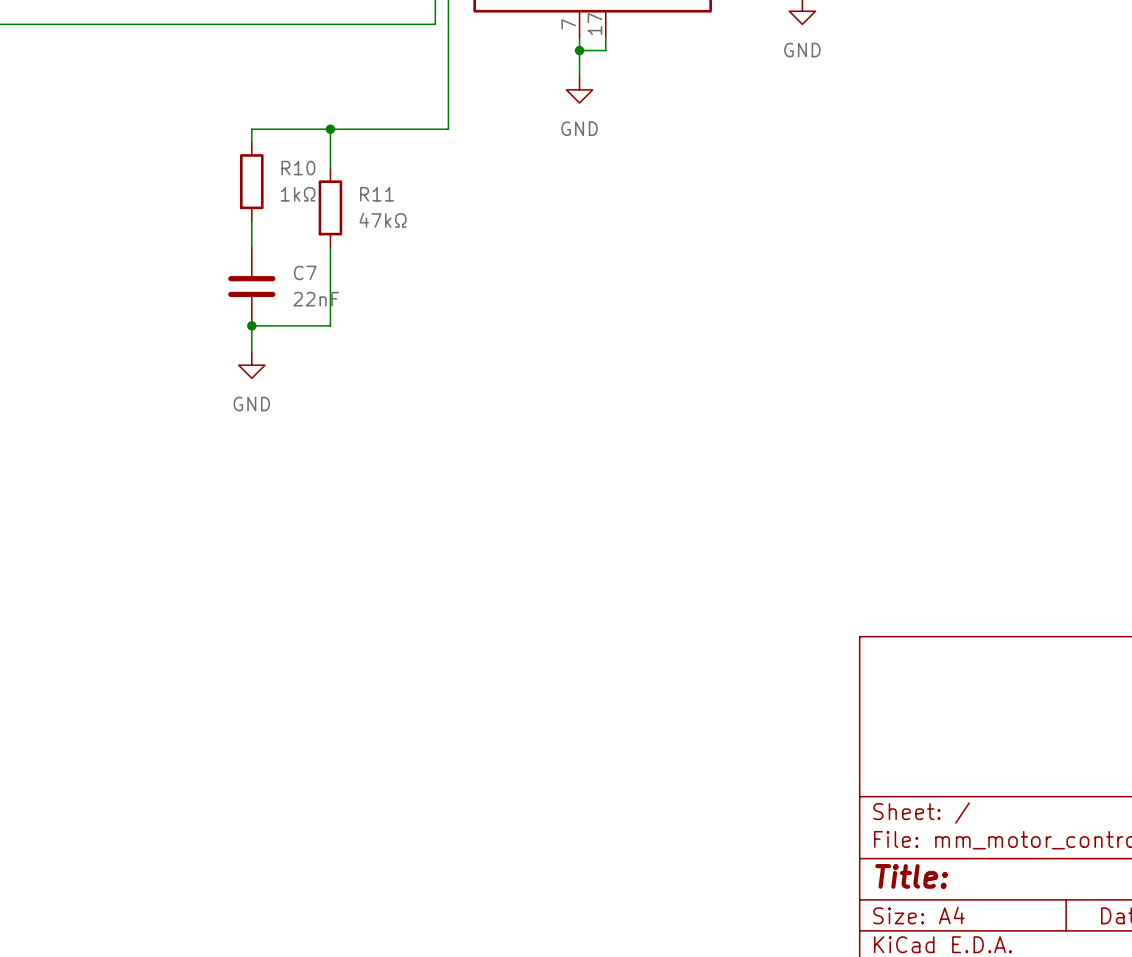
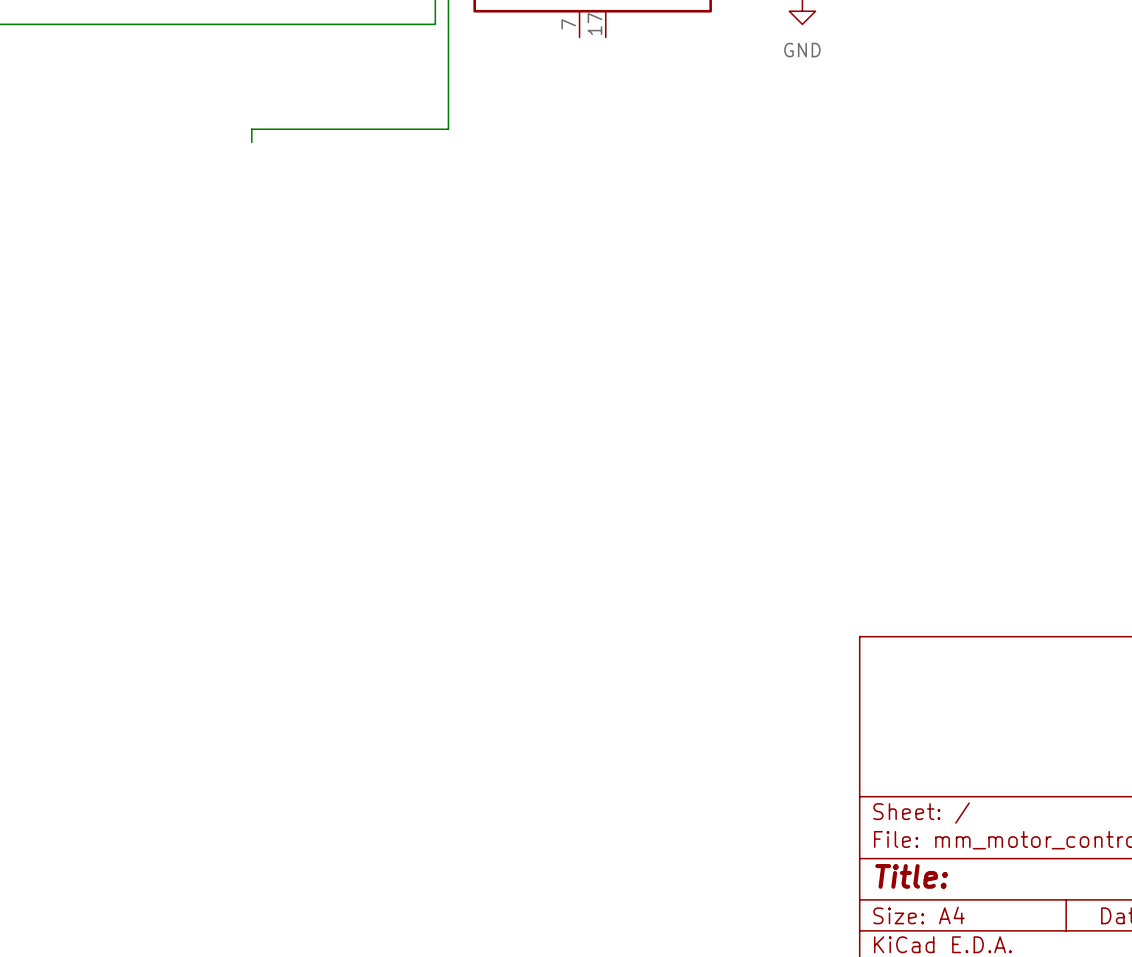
wire: (579, 37) (579, 76) -> none
wire: (605, 37) (605, 50) (579, 50) -> none
junction: (579, 50) -> none
power symbol: GND (579, 89) -> none
wire: (330, 129) (330, 168) -> none
junction: (330, 129) -> none
R10: 1kΩ (251, 181) -> none
R11: 47kΩ (330, 207) -> none
wire: (251, 220) (251, 247) -> none
wire: (330, 247) (330, 325) (251, 325) (251, 352) -> none
C7: 22nF (251, 286) -> none
junction: (251, 325) -> none
power symbol: GND (251, 365) -> none

